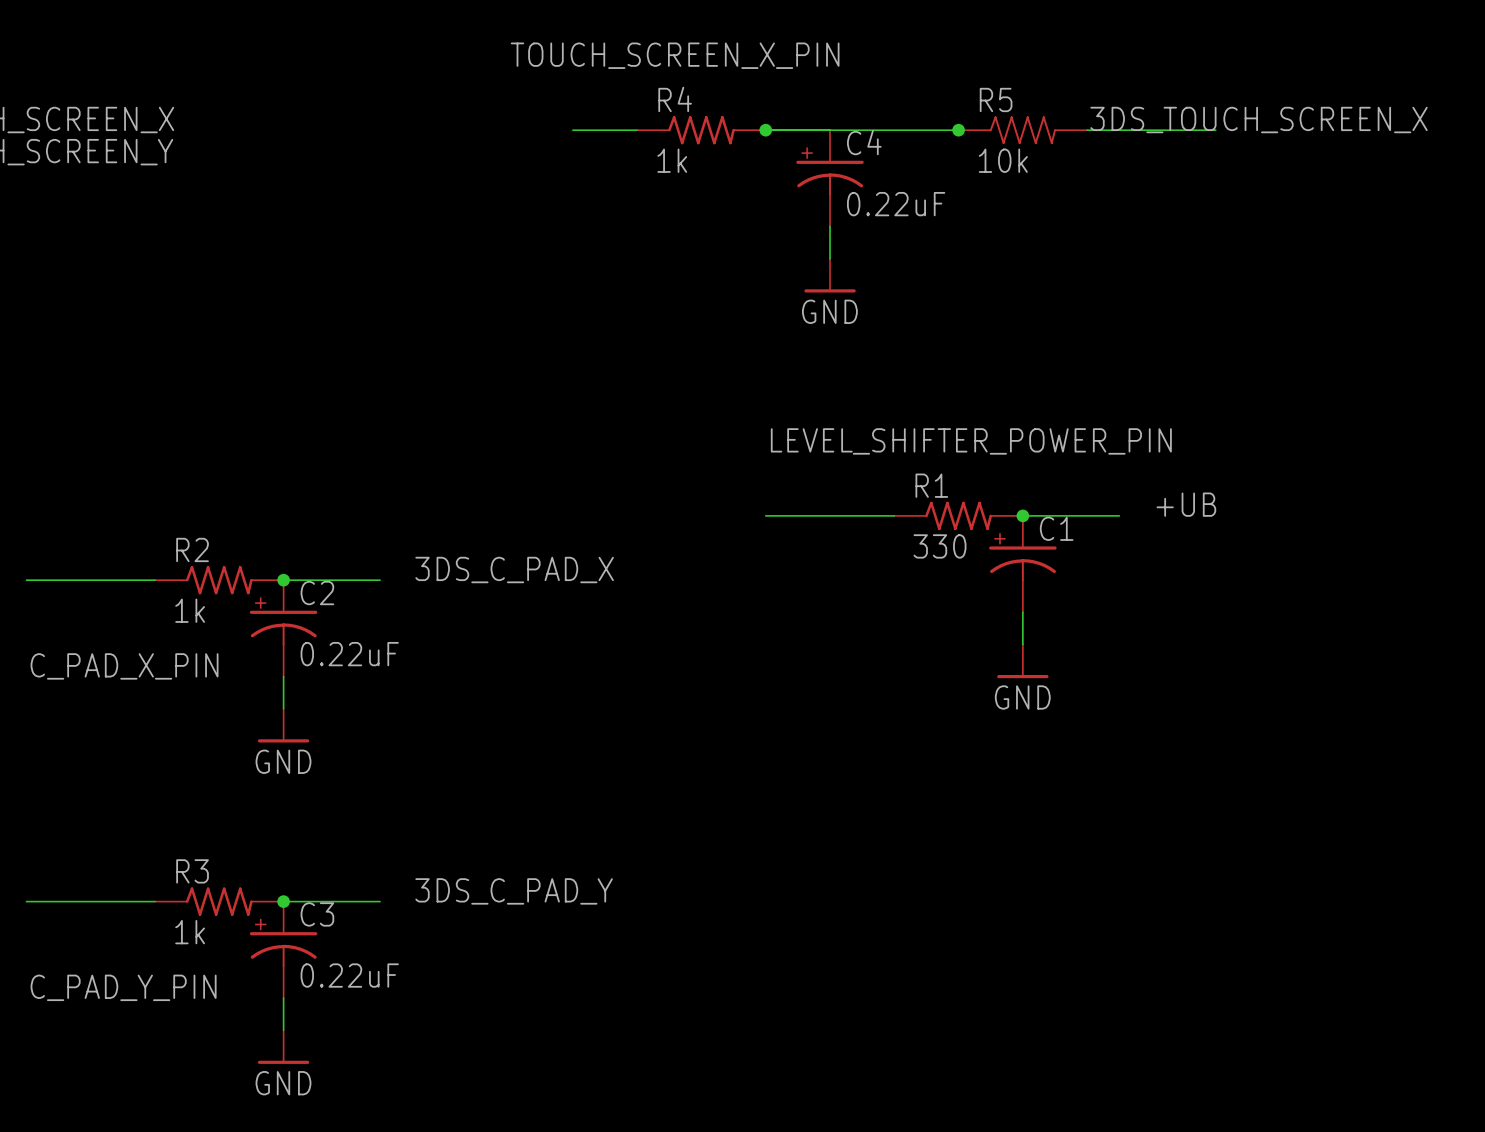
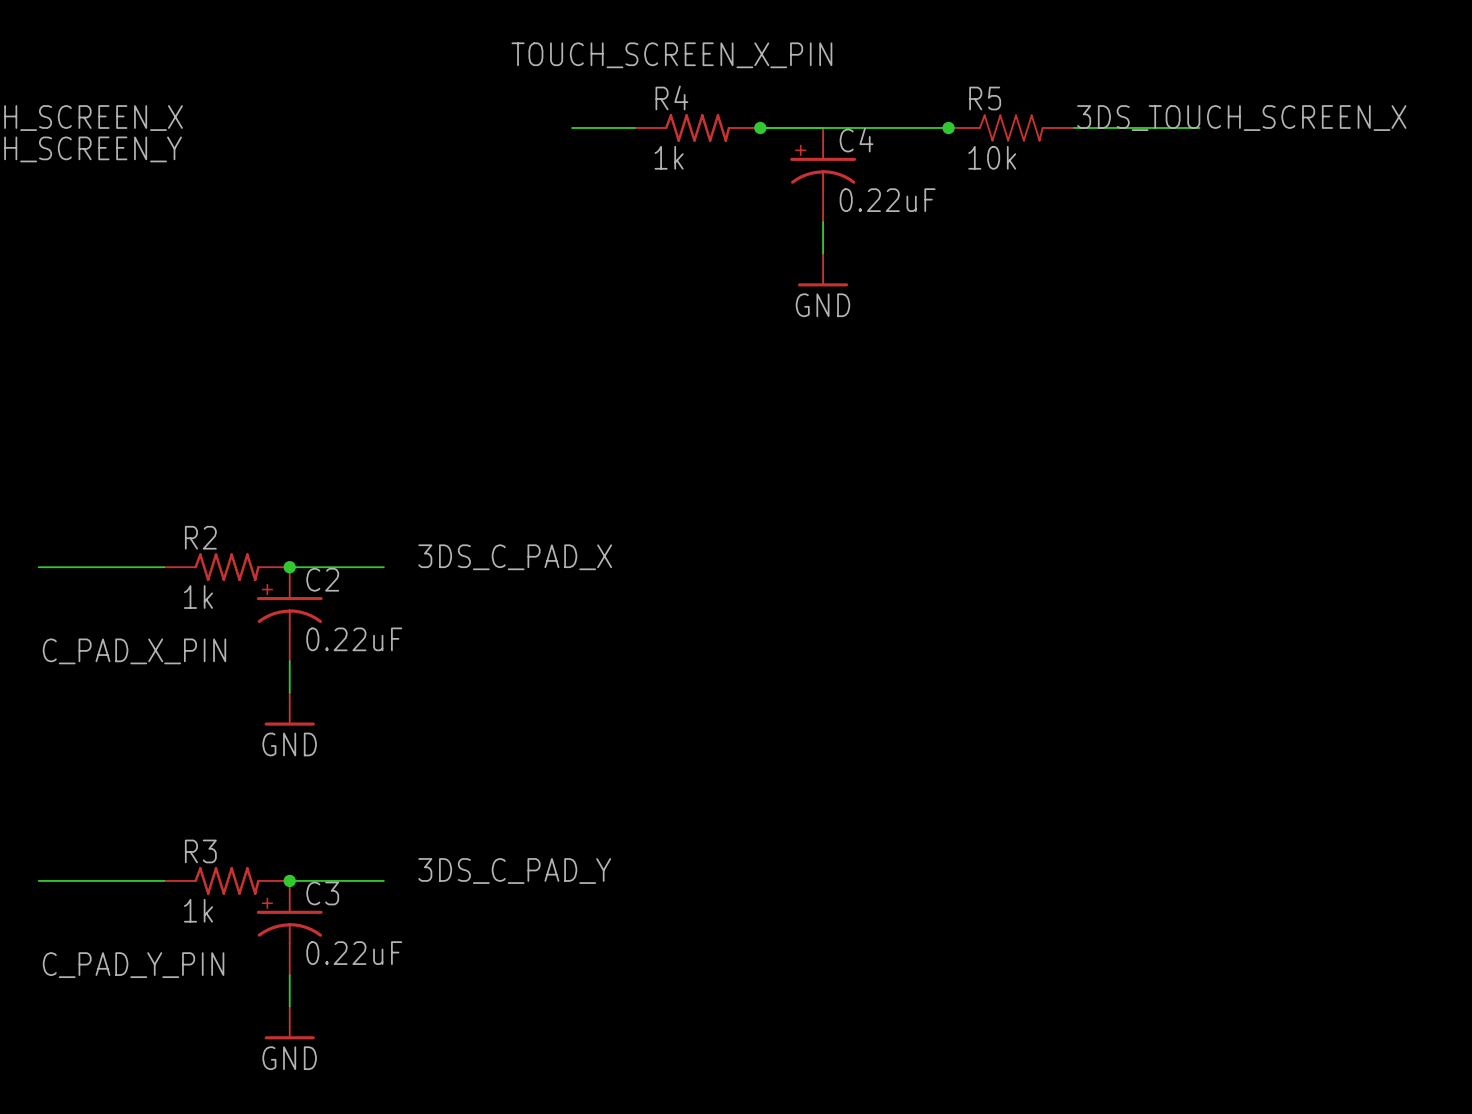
label: LEVEL_SHIFTER_POWER_PIN (971, 441) -> none
label: +UB (1186, 504) -> none
wire: (765, 515) (894, 515) -> none
R1: 330 (958, 515) -> none
wire: (1022, 515) (1119, 515) -> none
junction: (1022, 515) -> none
C1: (1022, 564) -> none
wire: (1022, 612) (1022, 644) -> none
power symbol: GND (1022, 661) -> none

